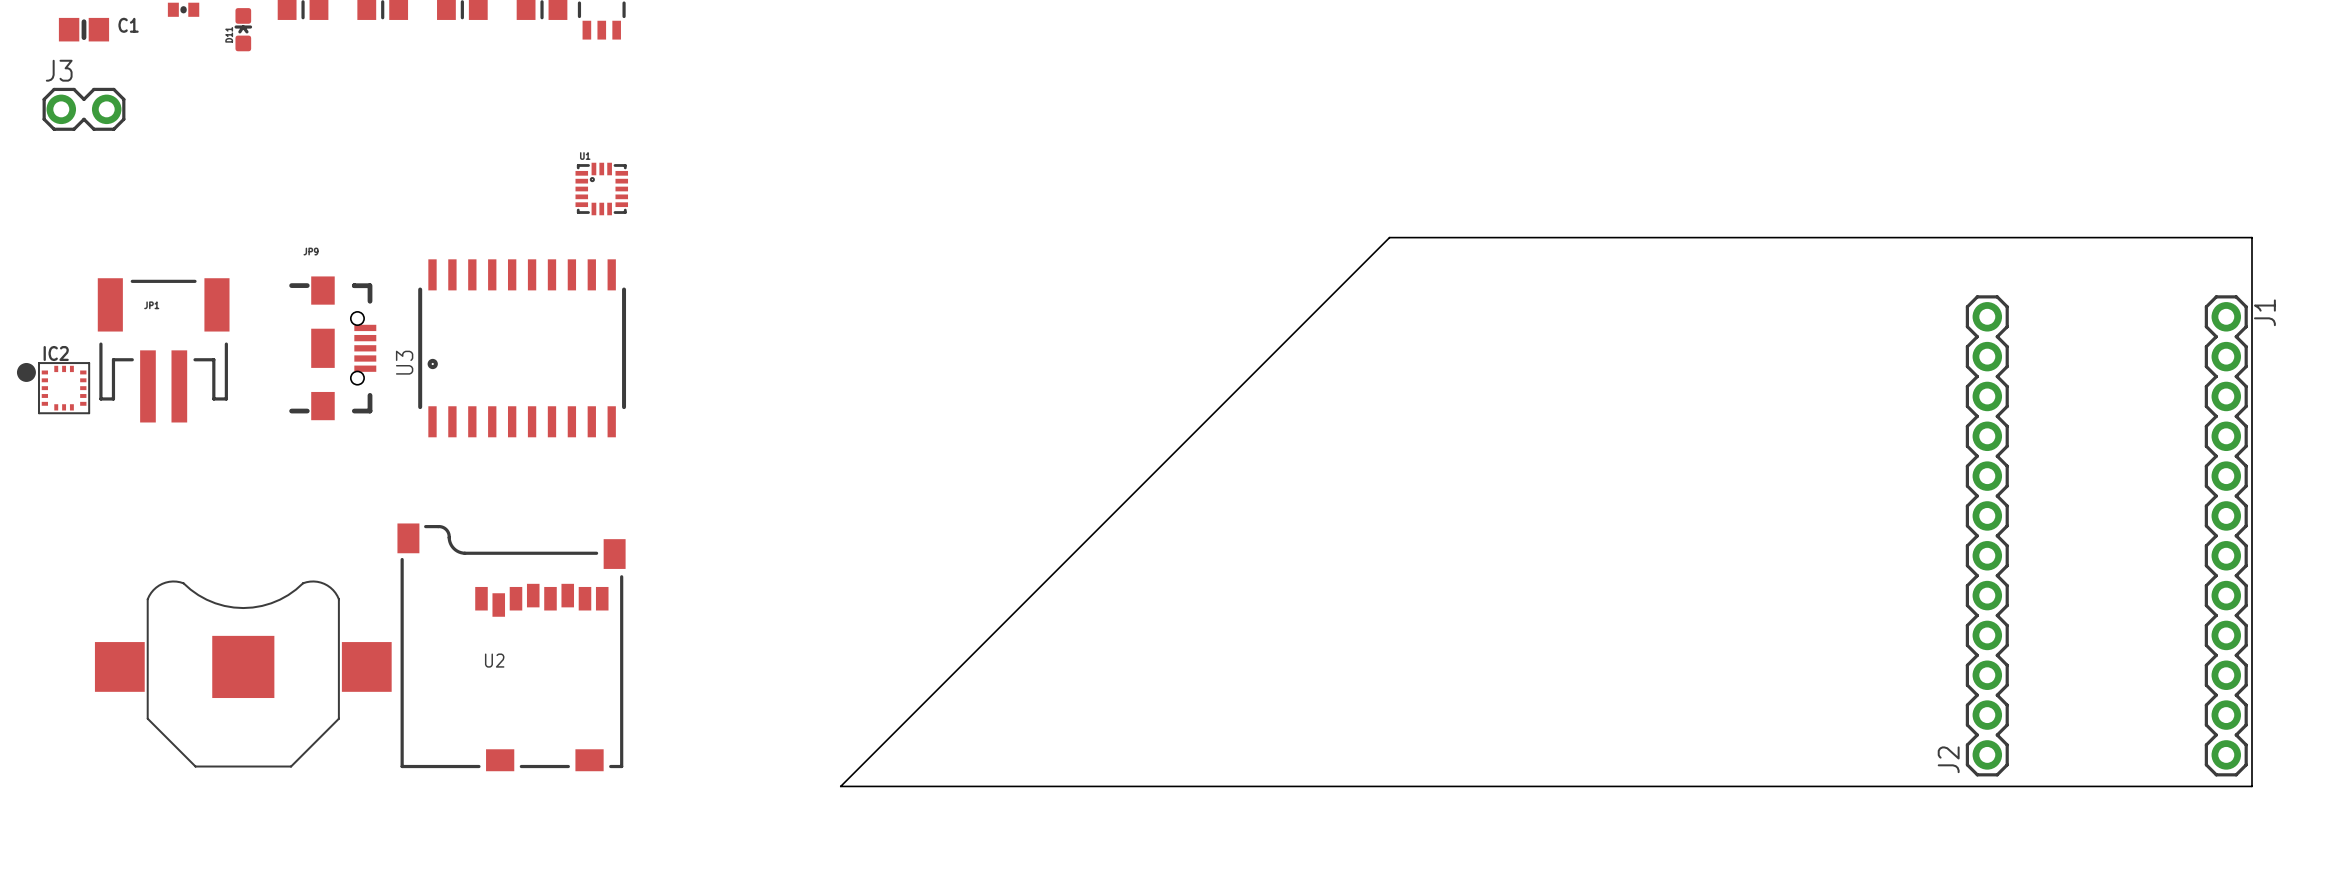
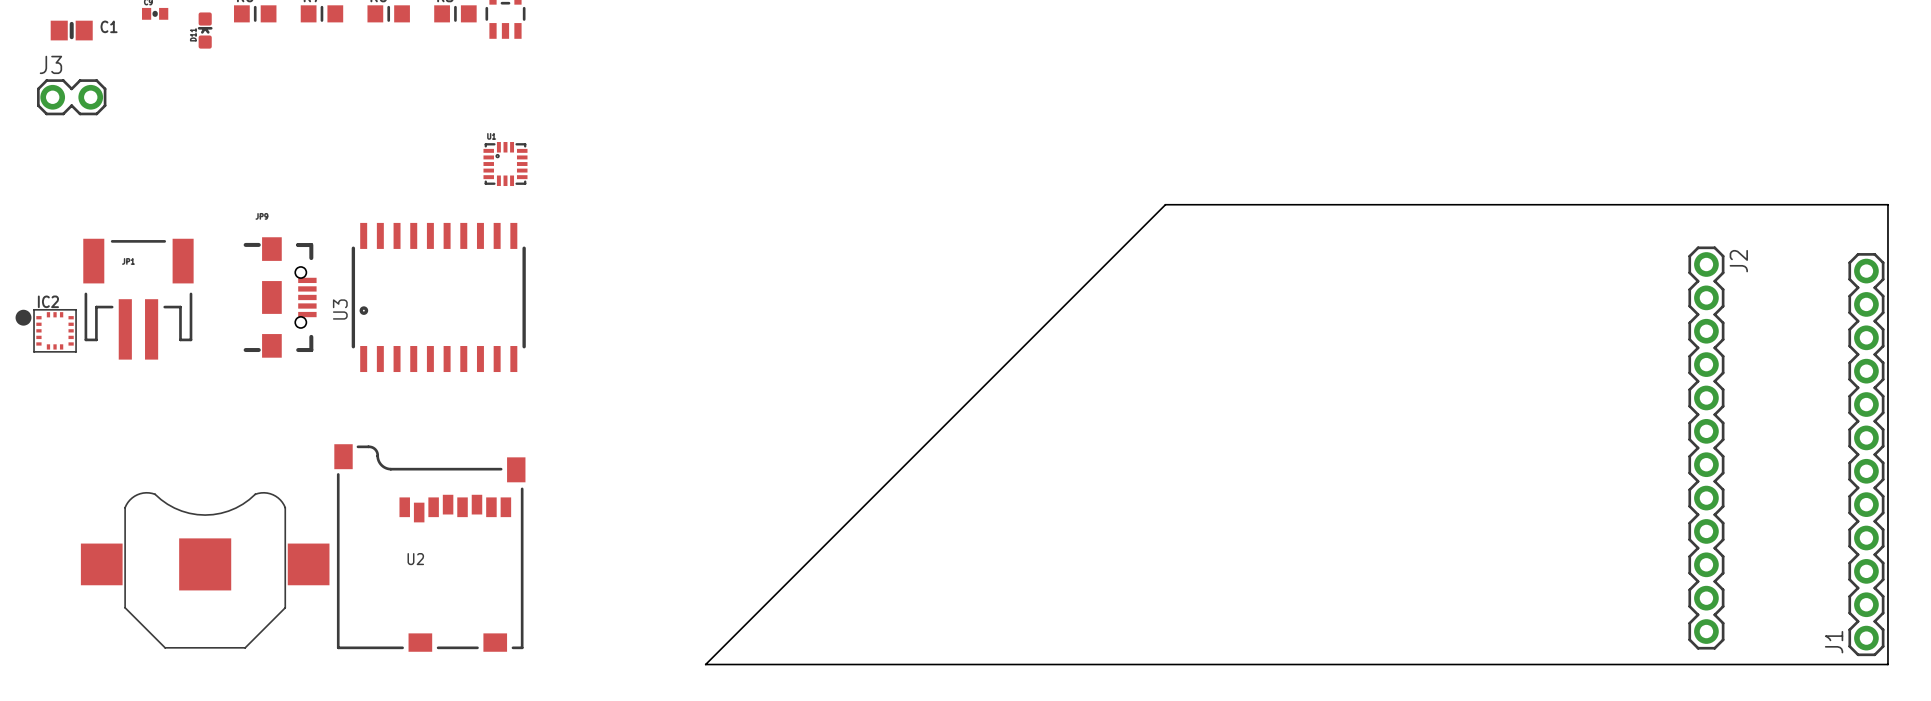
J1 name position: J1 (2264, 312) -> J1 (1834, 642)
J2 position: (1987, 535) -> (1706, 448)
J2 name position: J2 (1948, 759) -> J2 (1738, 261)

